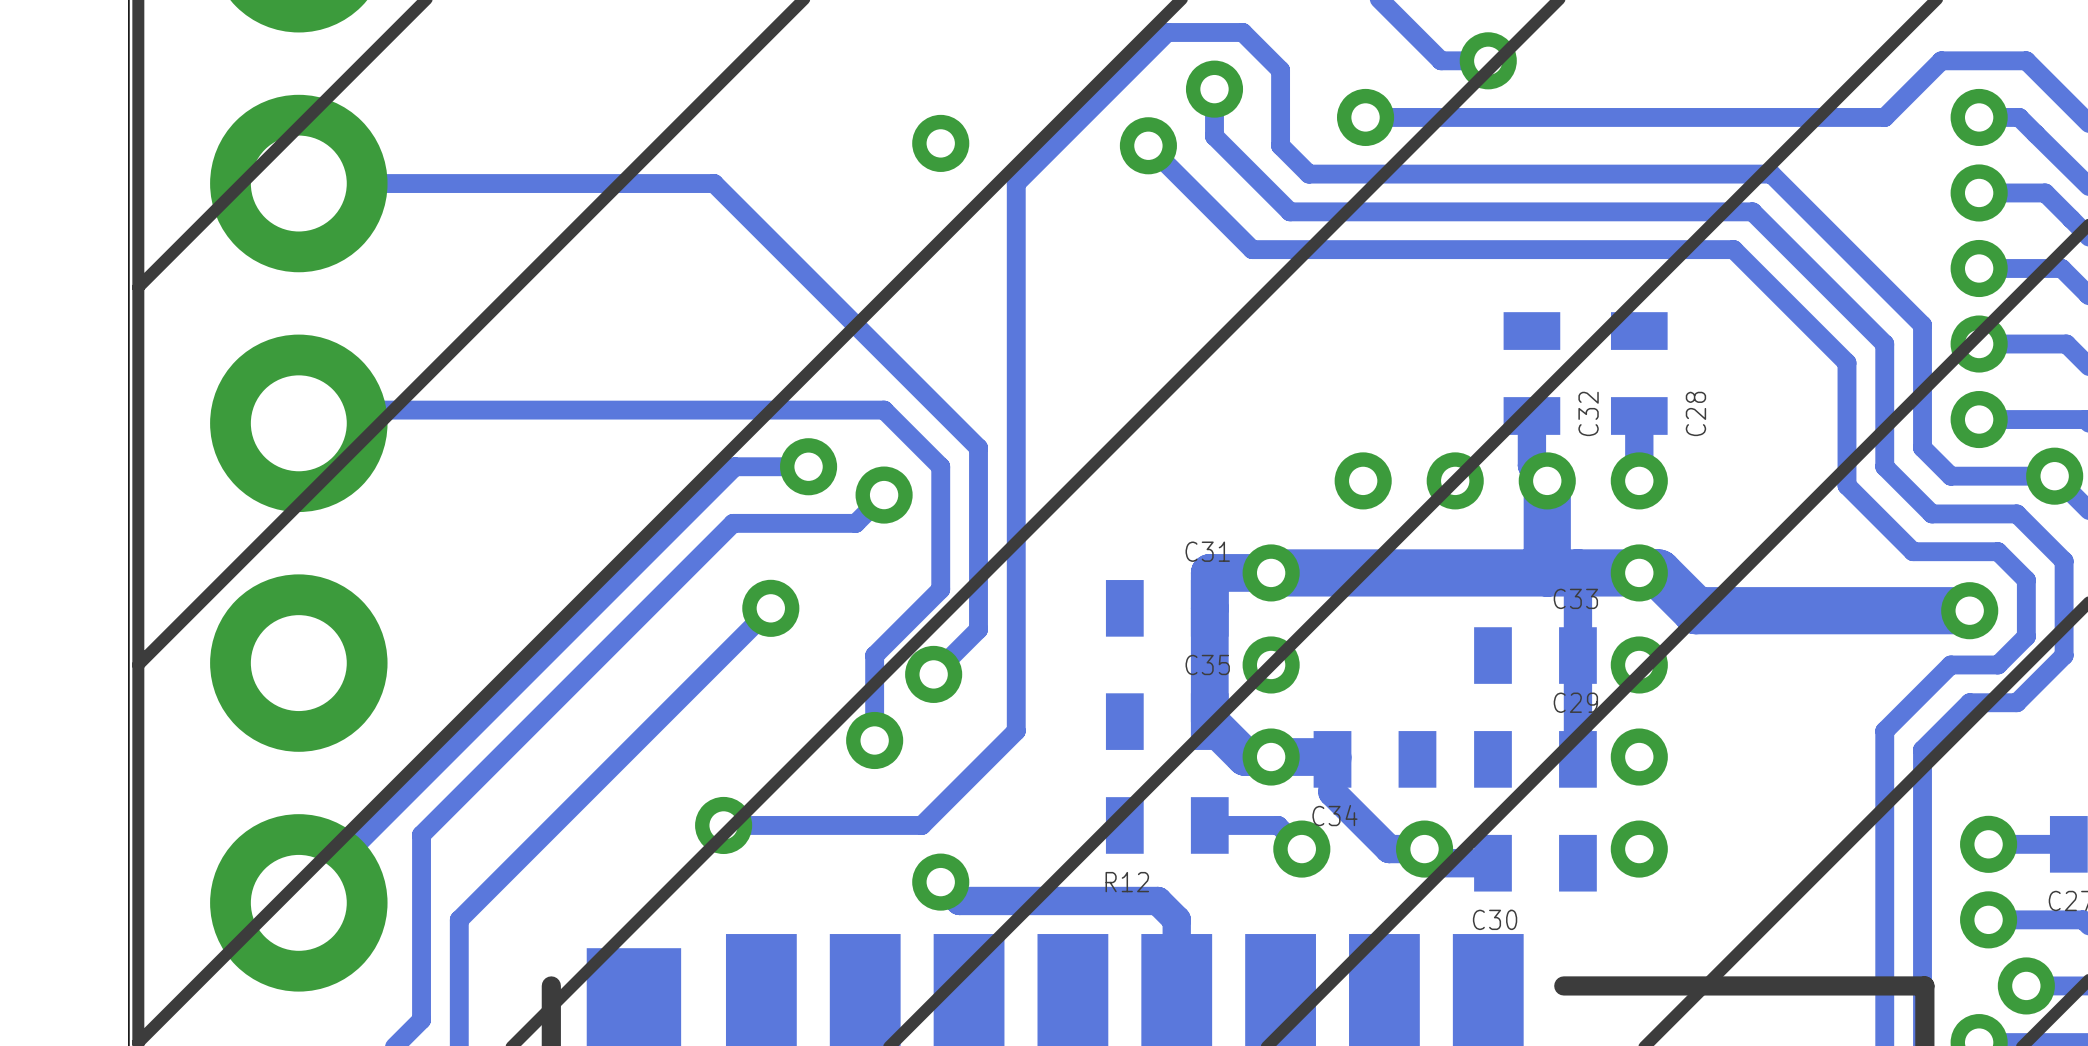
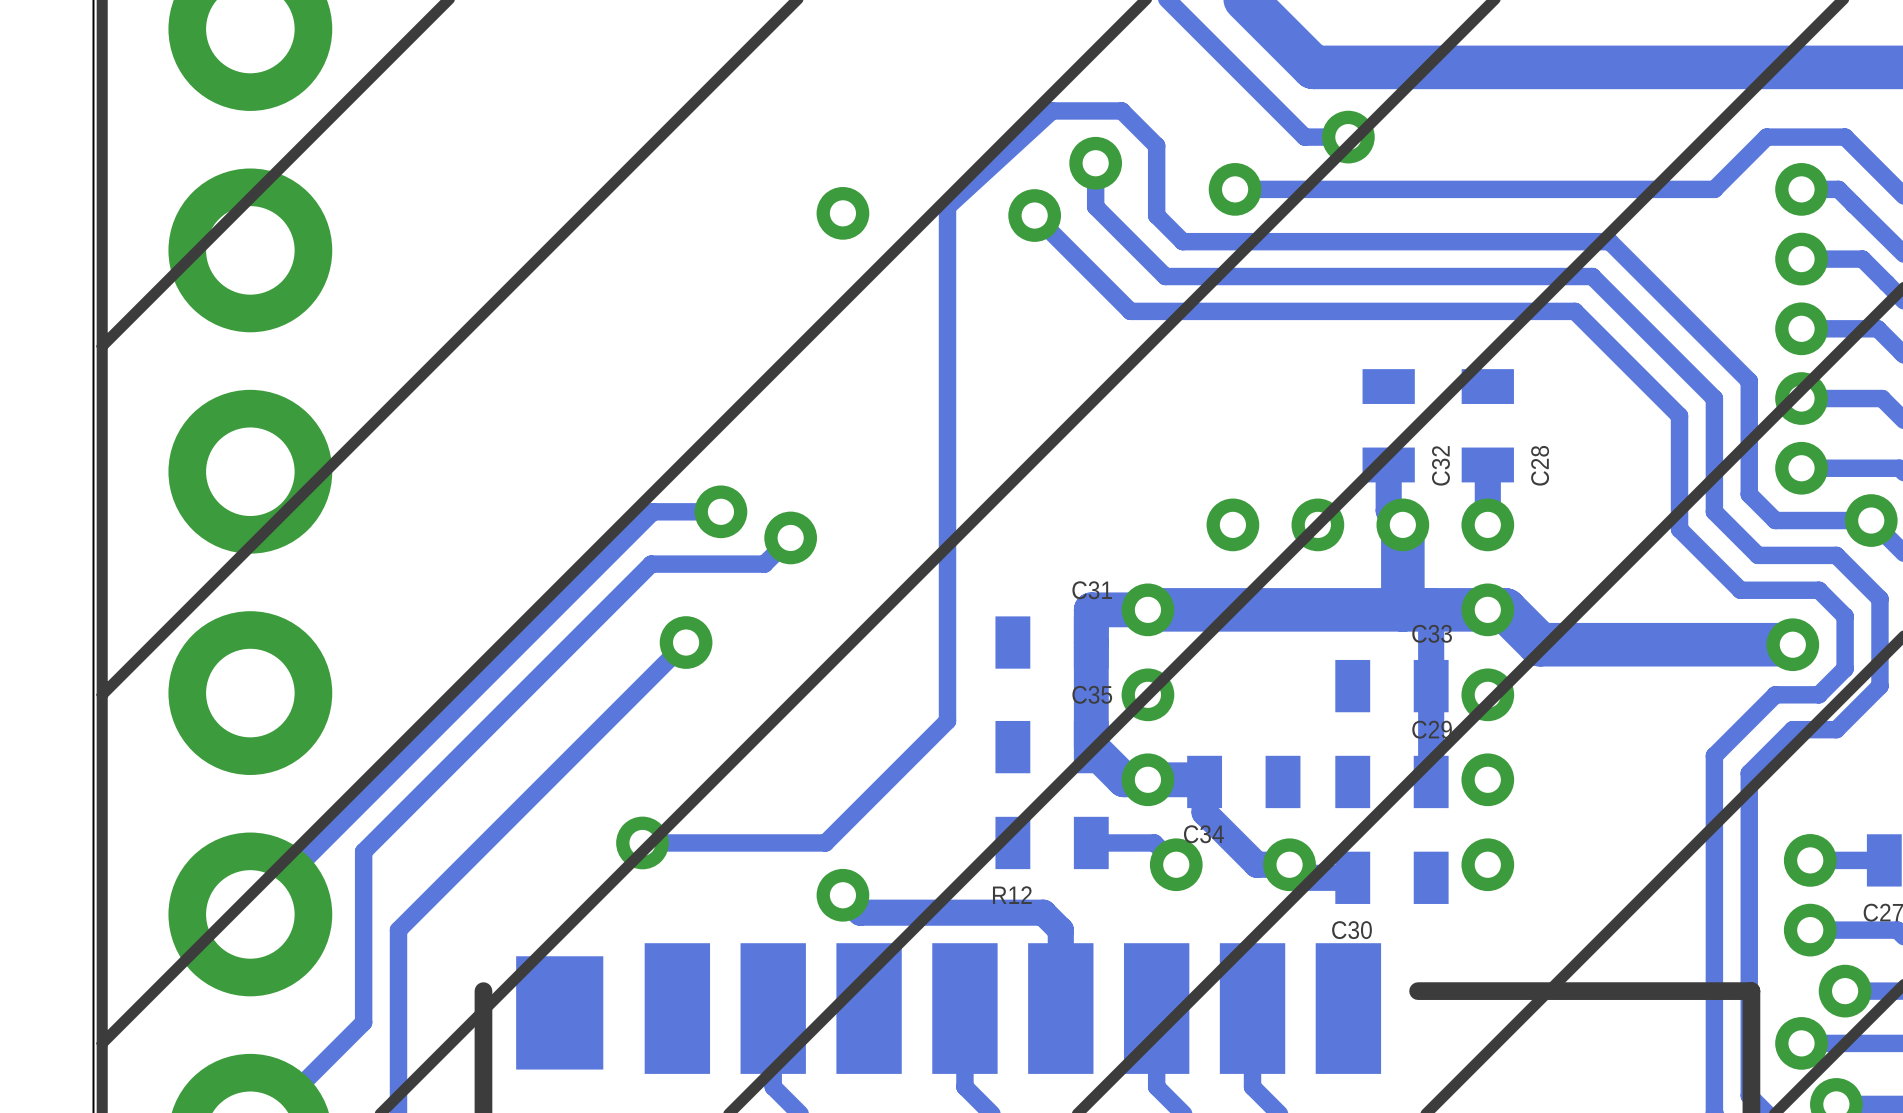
track: (1167, 32) (1016, 183) (1016, 731) -> (1052, 110) (947, 206) (947, 720) (912, 755)
track: (298, 183) (714, 183) (978, 447) (978, 629) (933, 674) -> none
track: (298, 423) (312, 410) (884, 410) (940, 466) (940, 589) (874, 655) (874, 740) -> none
via: (933, 674) -> none
via: (874, 740) -> none

